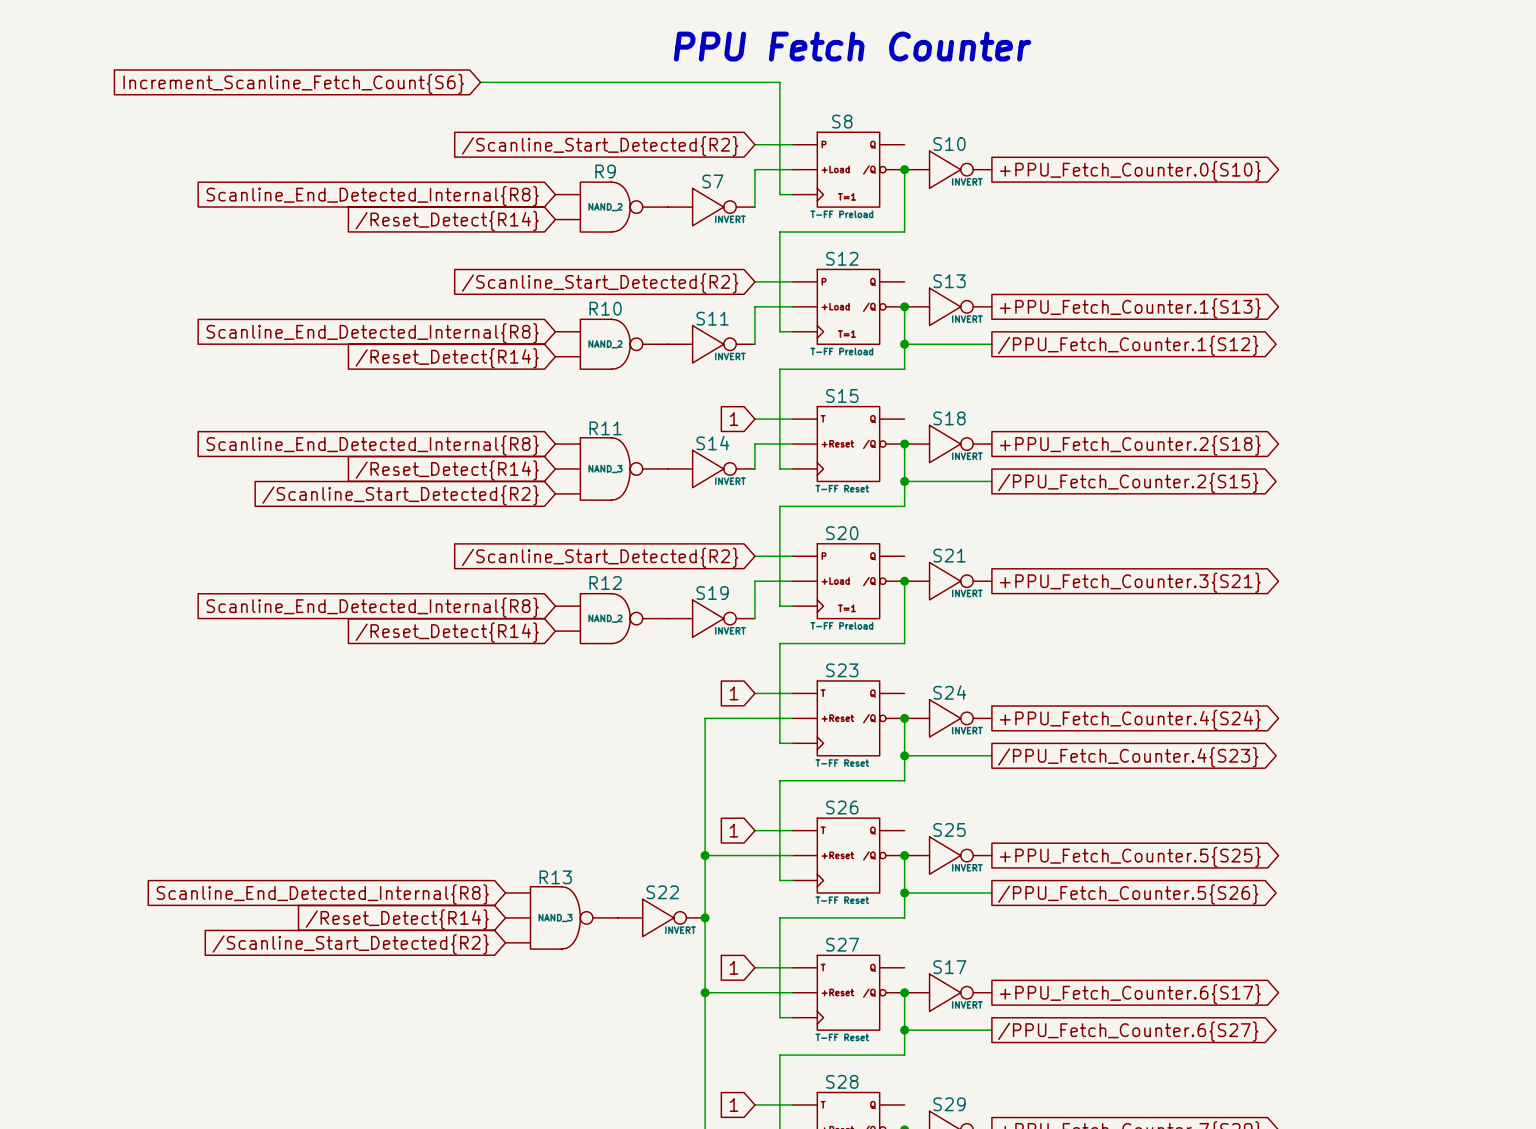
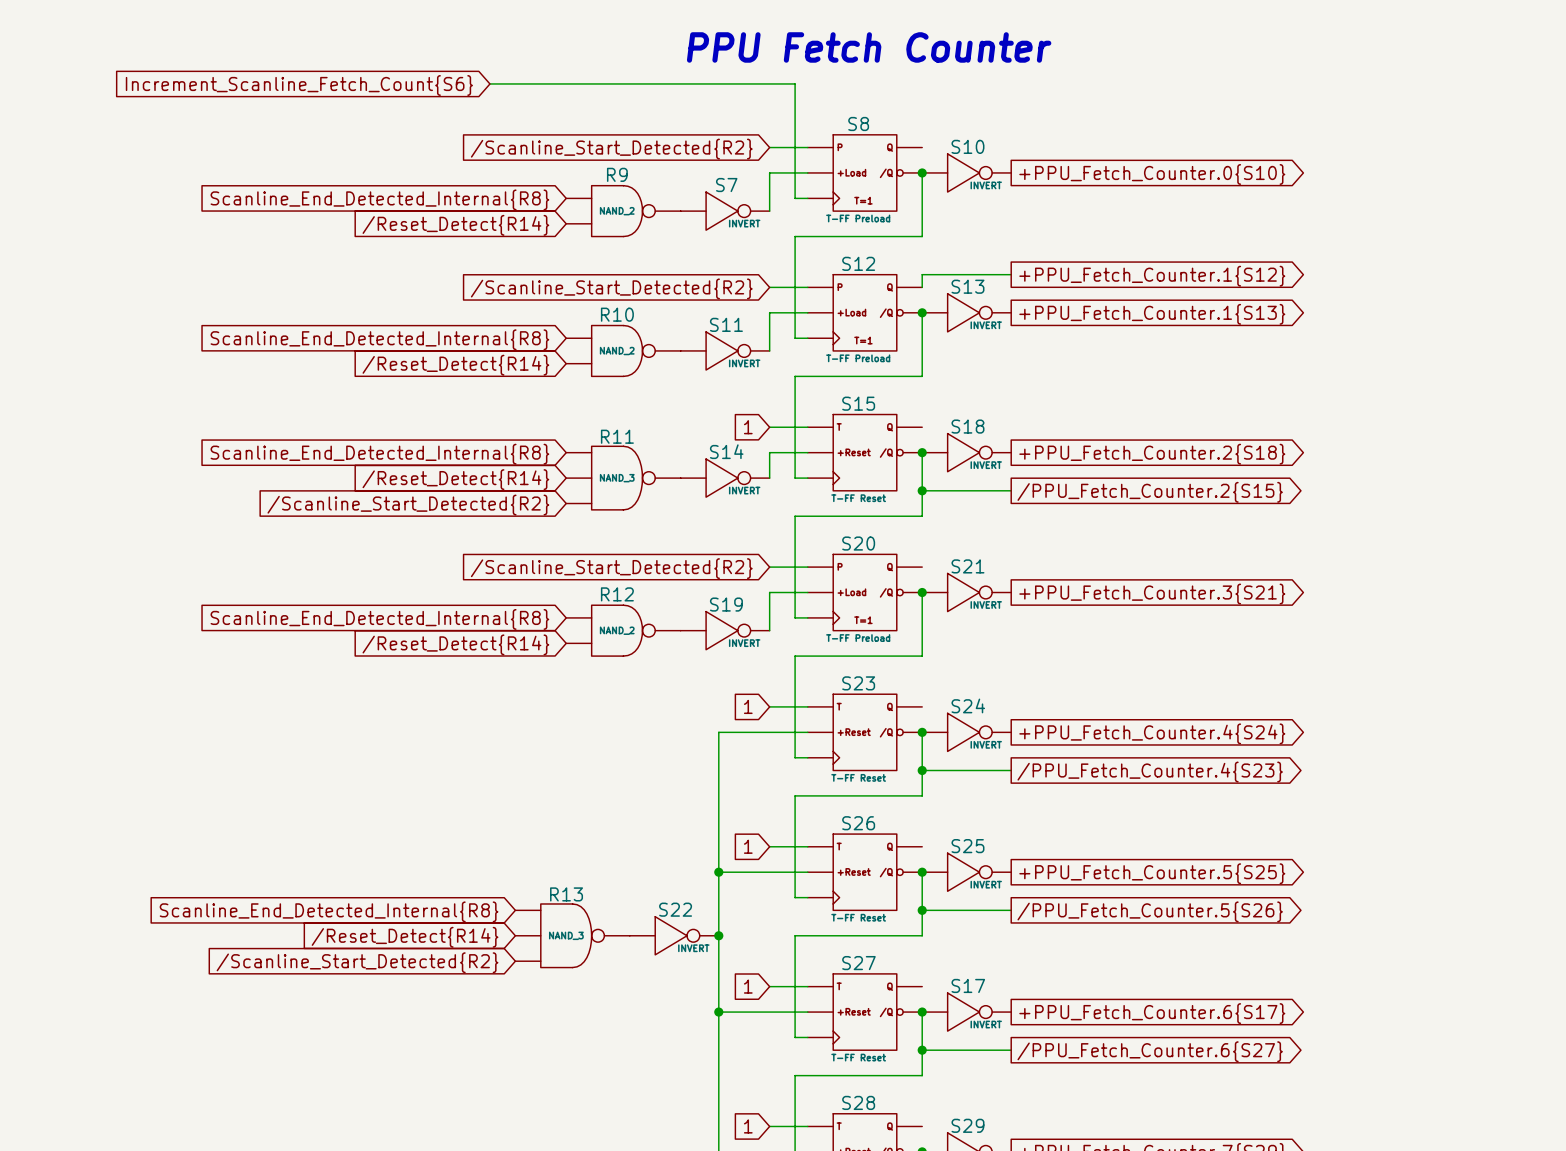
wire: none -> (1011, 274) (922, 274) (922, 287)
global label: none -> +PPU_Fetch_Counter.1{S12} (1152, 276)
wire: (904, 344) (991, 344) -> none
junction: (904, 344) -> none
global label: /PPU_Fetch_Counter.1{S12} (1128, 345) -> none

